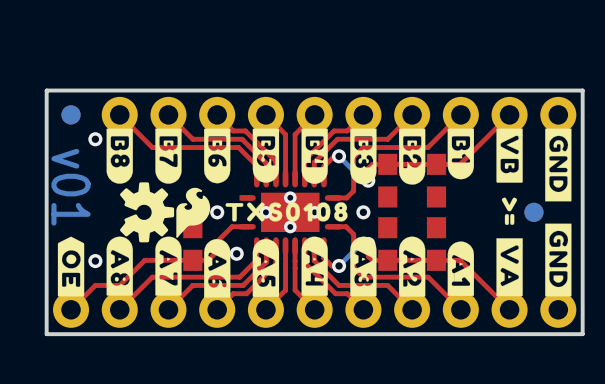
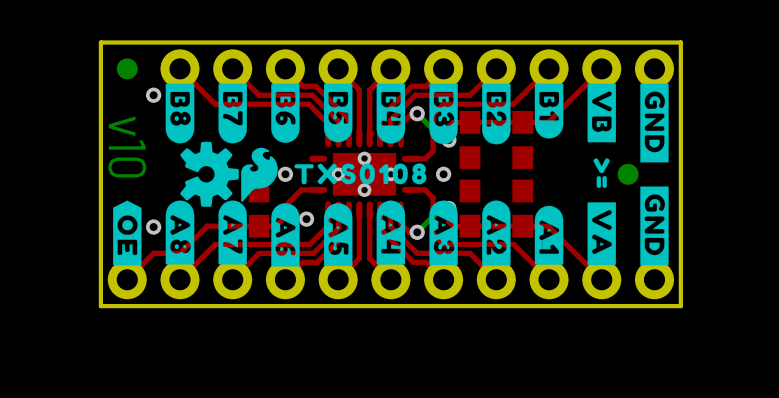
text: v01 (71, 187) -> v10 (127, 147)

